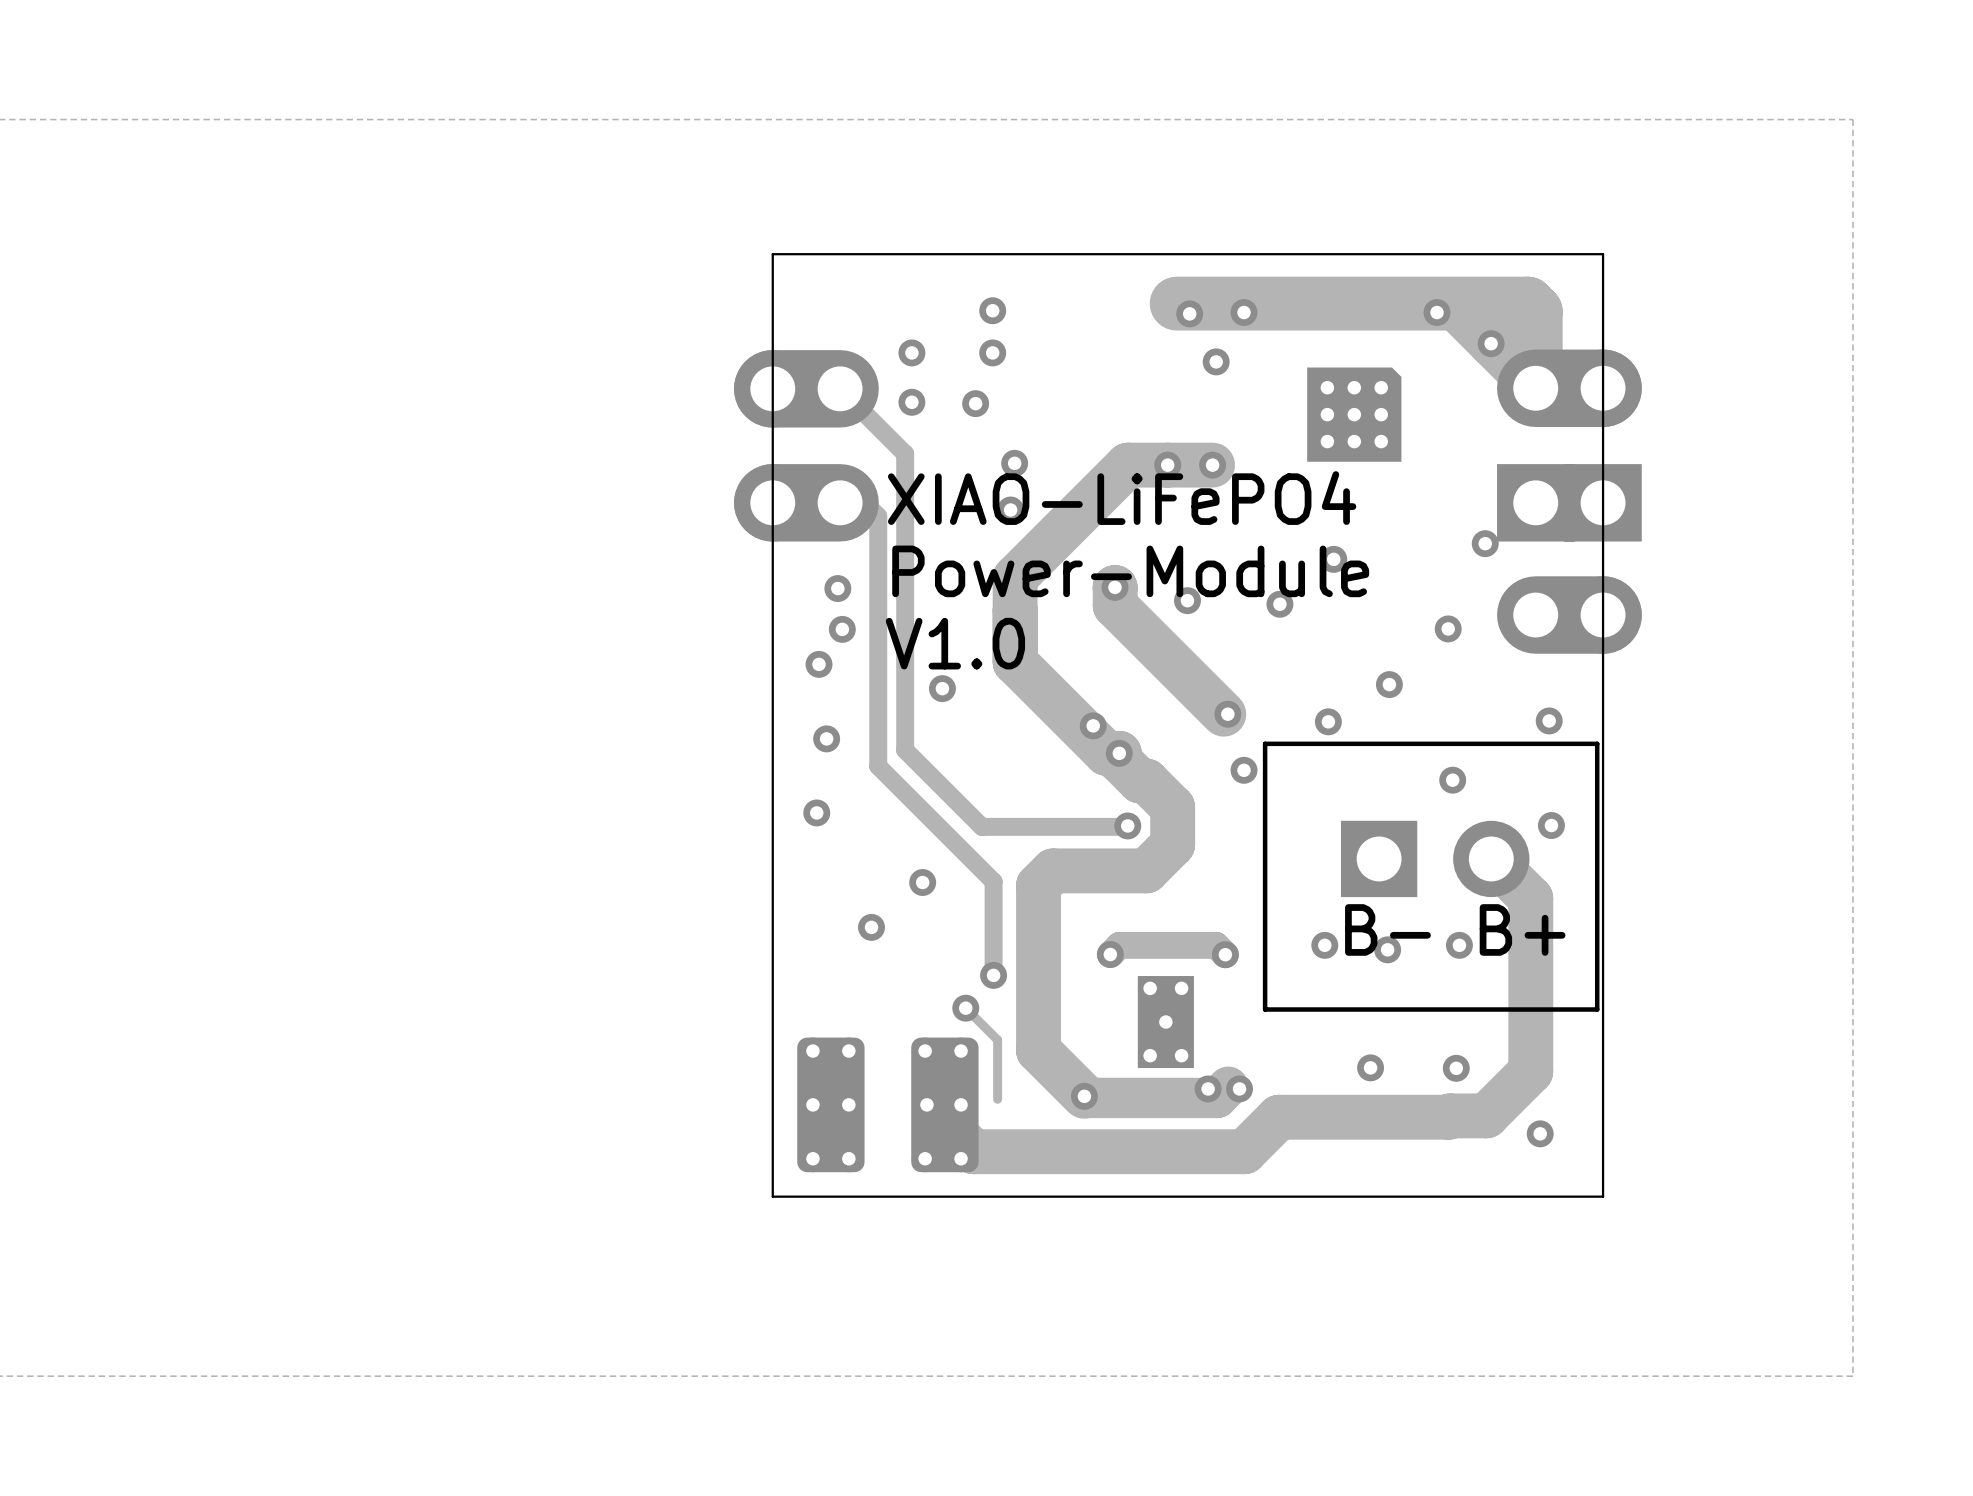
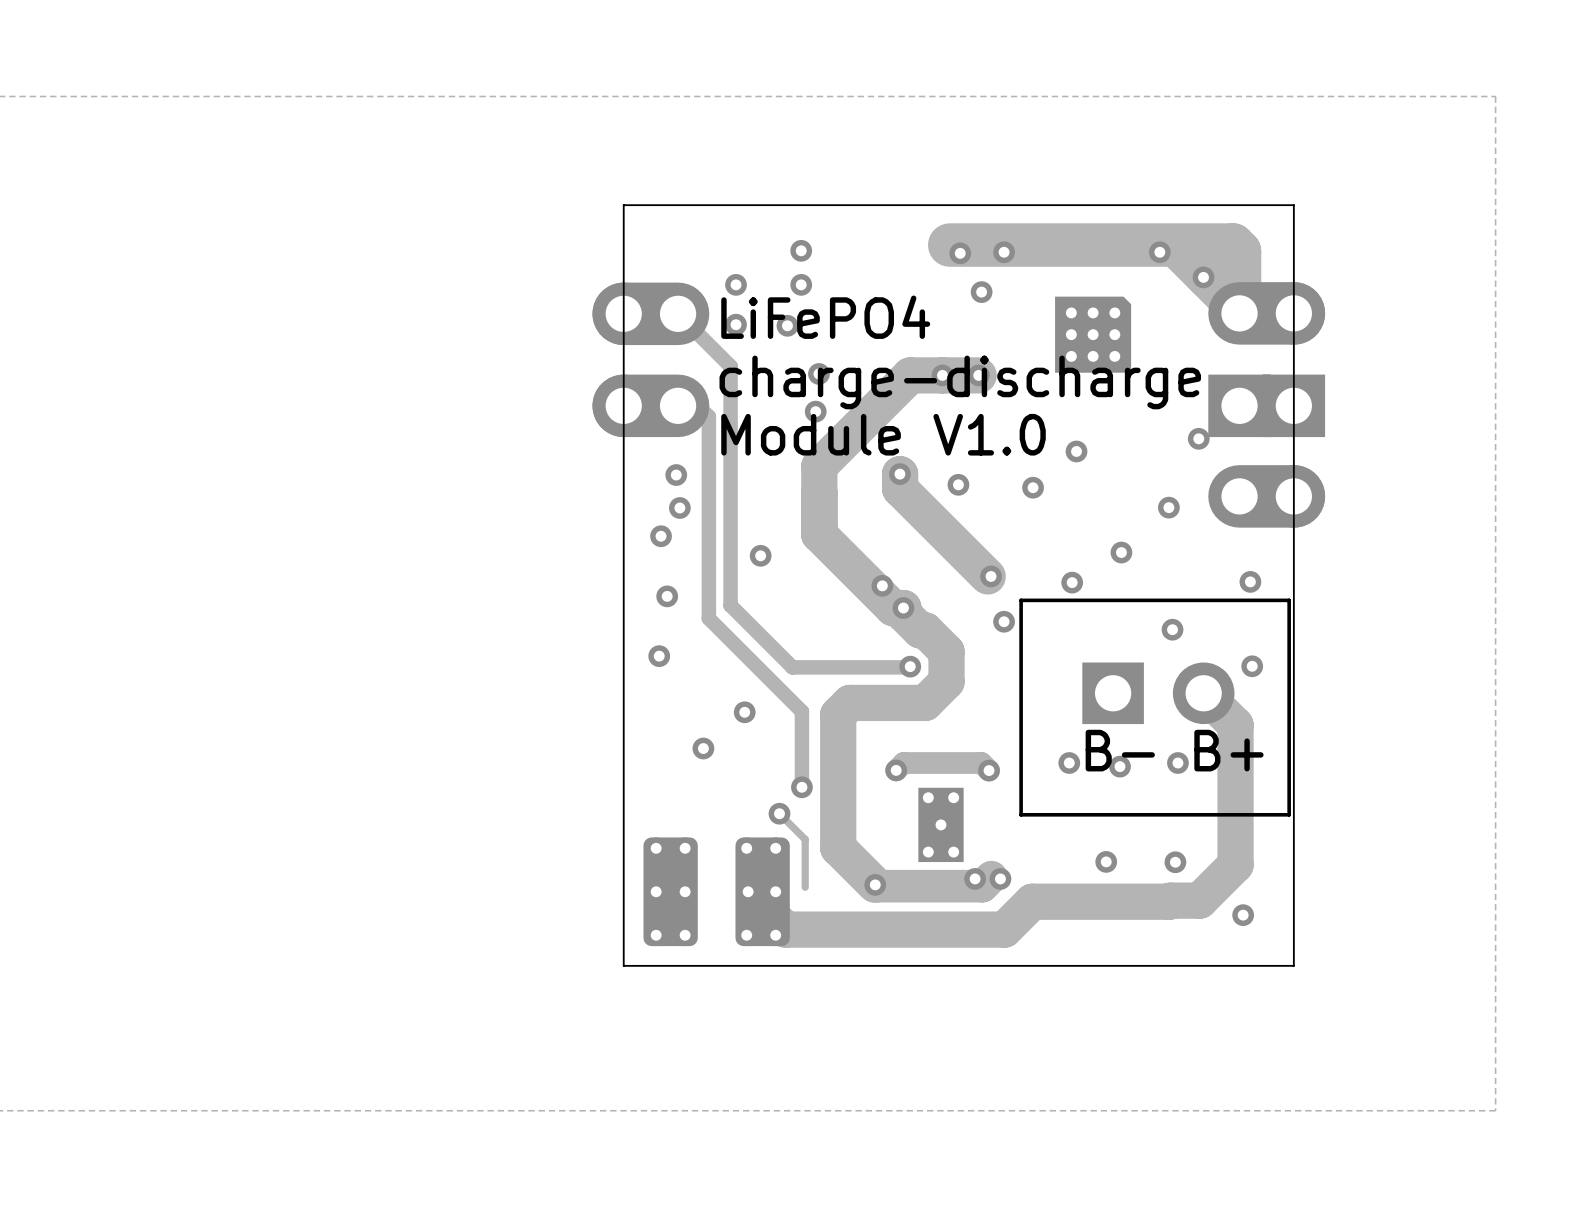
text: none -> LiFePO4 (825, 317)
text: none -> charge-discharge (960, 382)
text: XIAO-LiFePO4 (1122, 498) -> none
text: none -> Module V1.0 (883, 434)
text: Power-Module (1130, 571) -> none
text: V1.0 (955, 643) -> none

